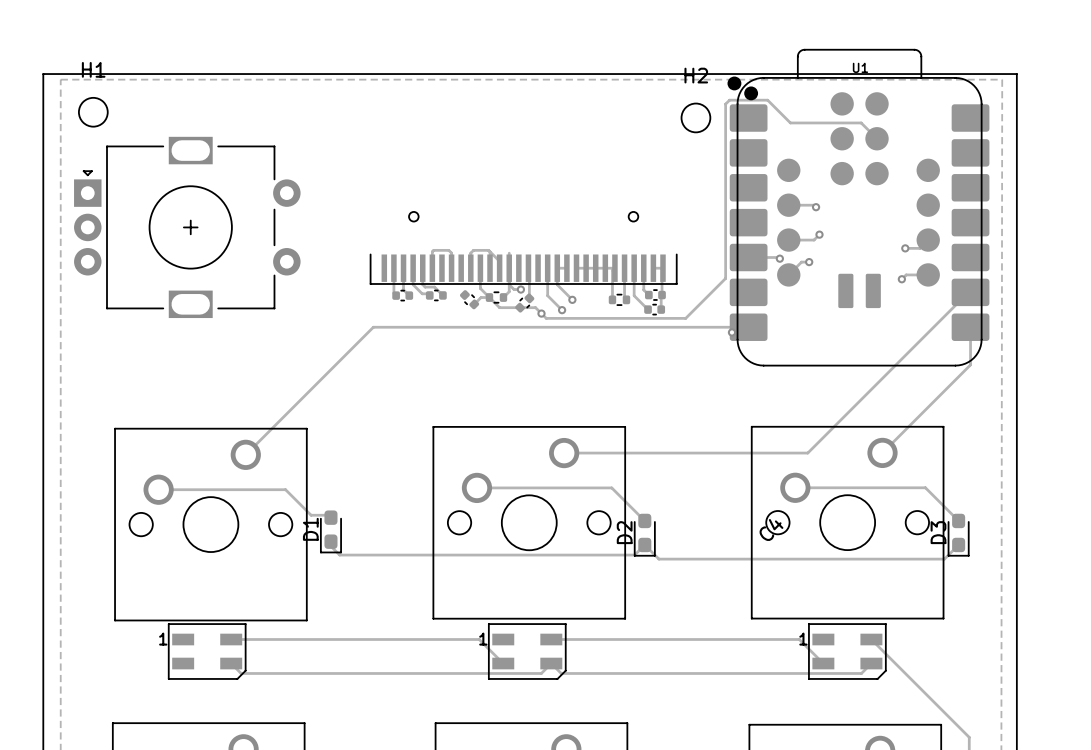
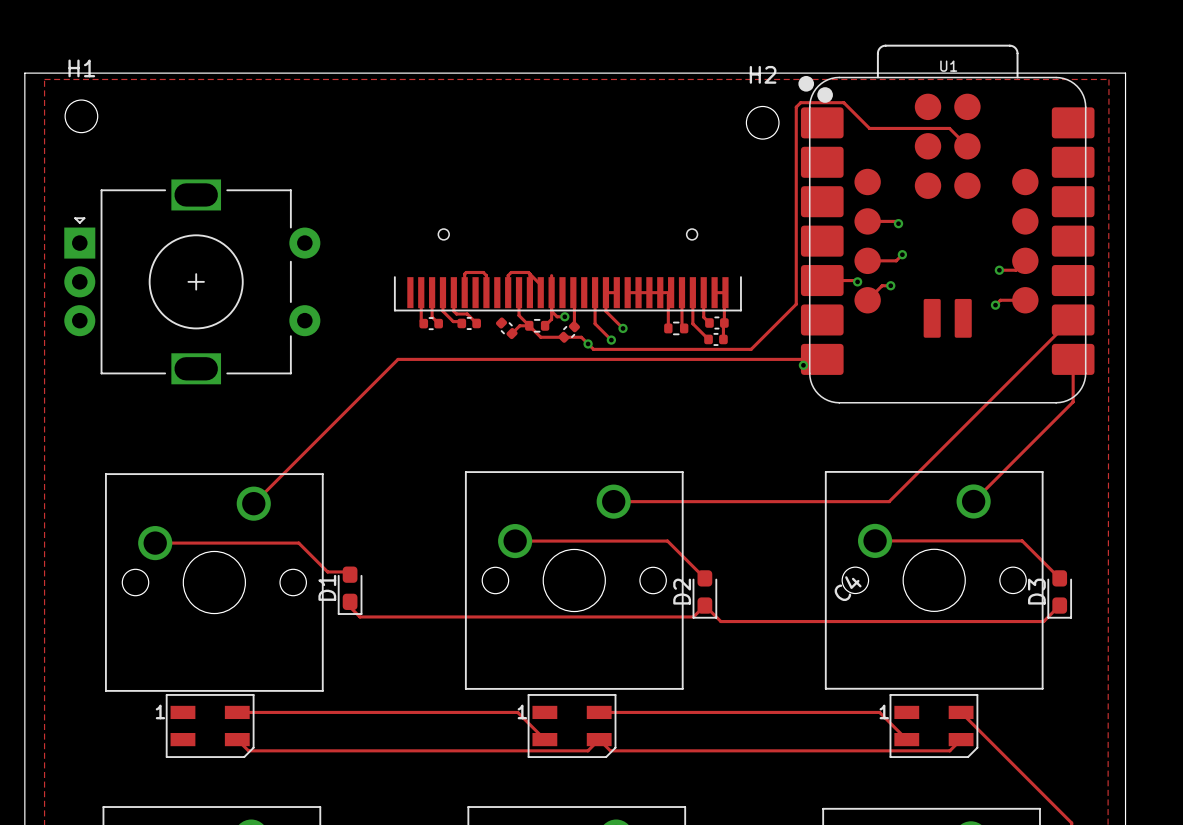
part position: (187, 227) -> (192, 281)

